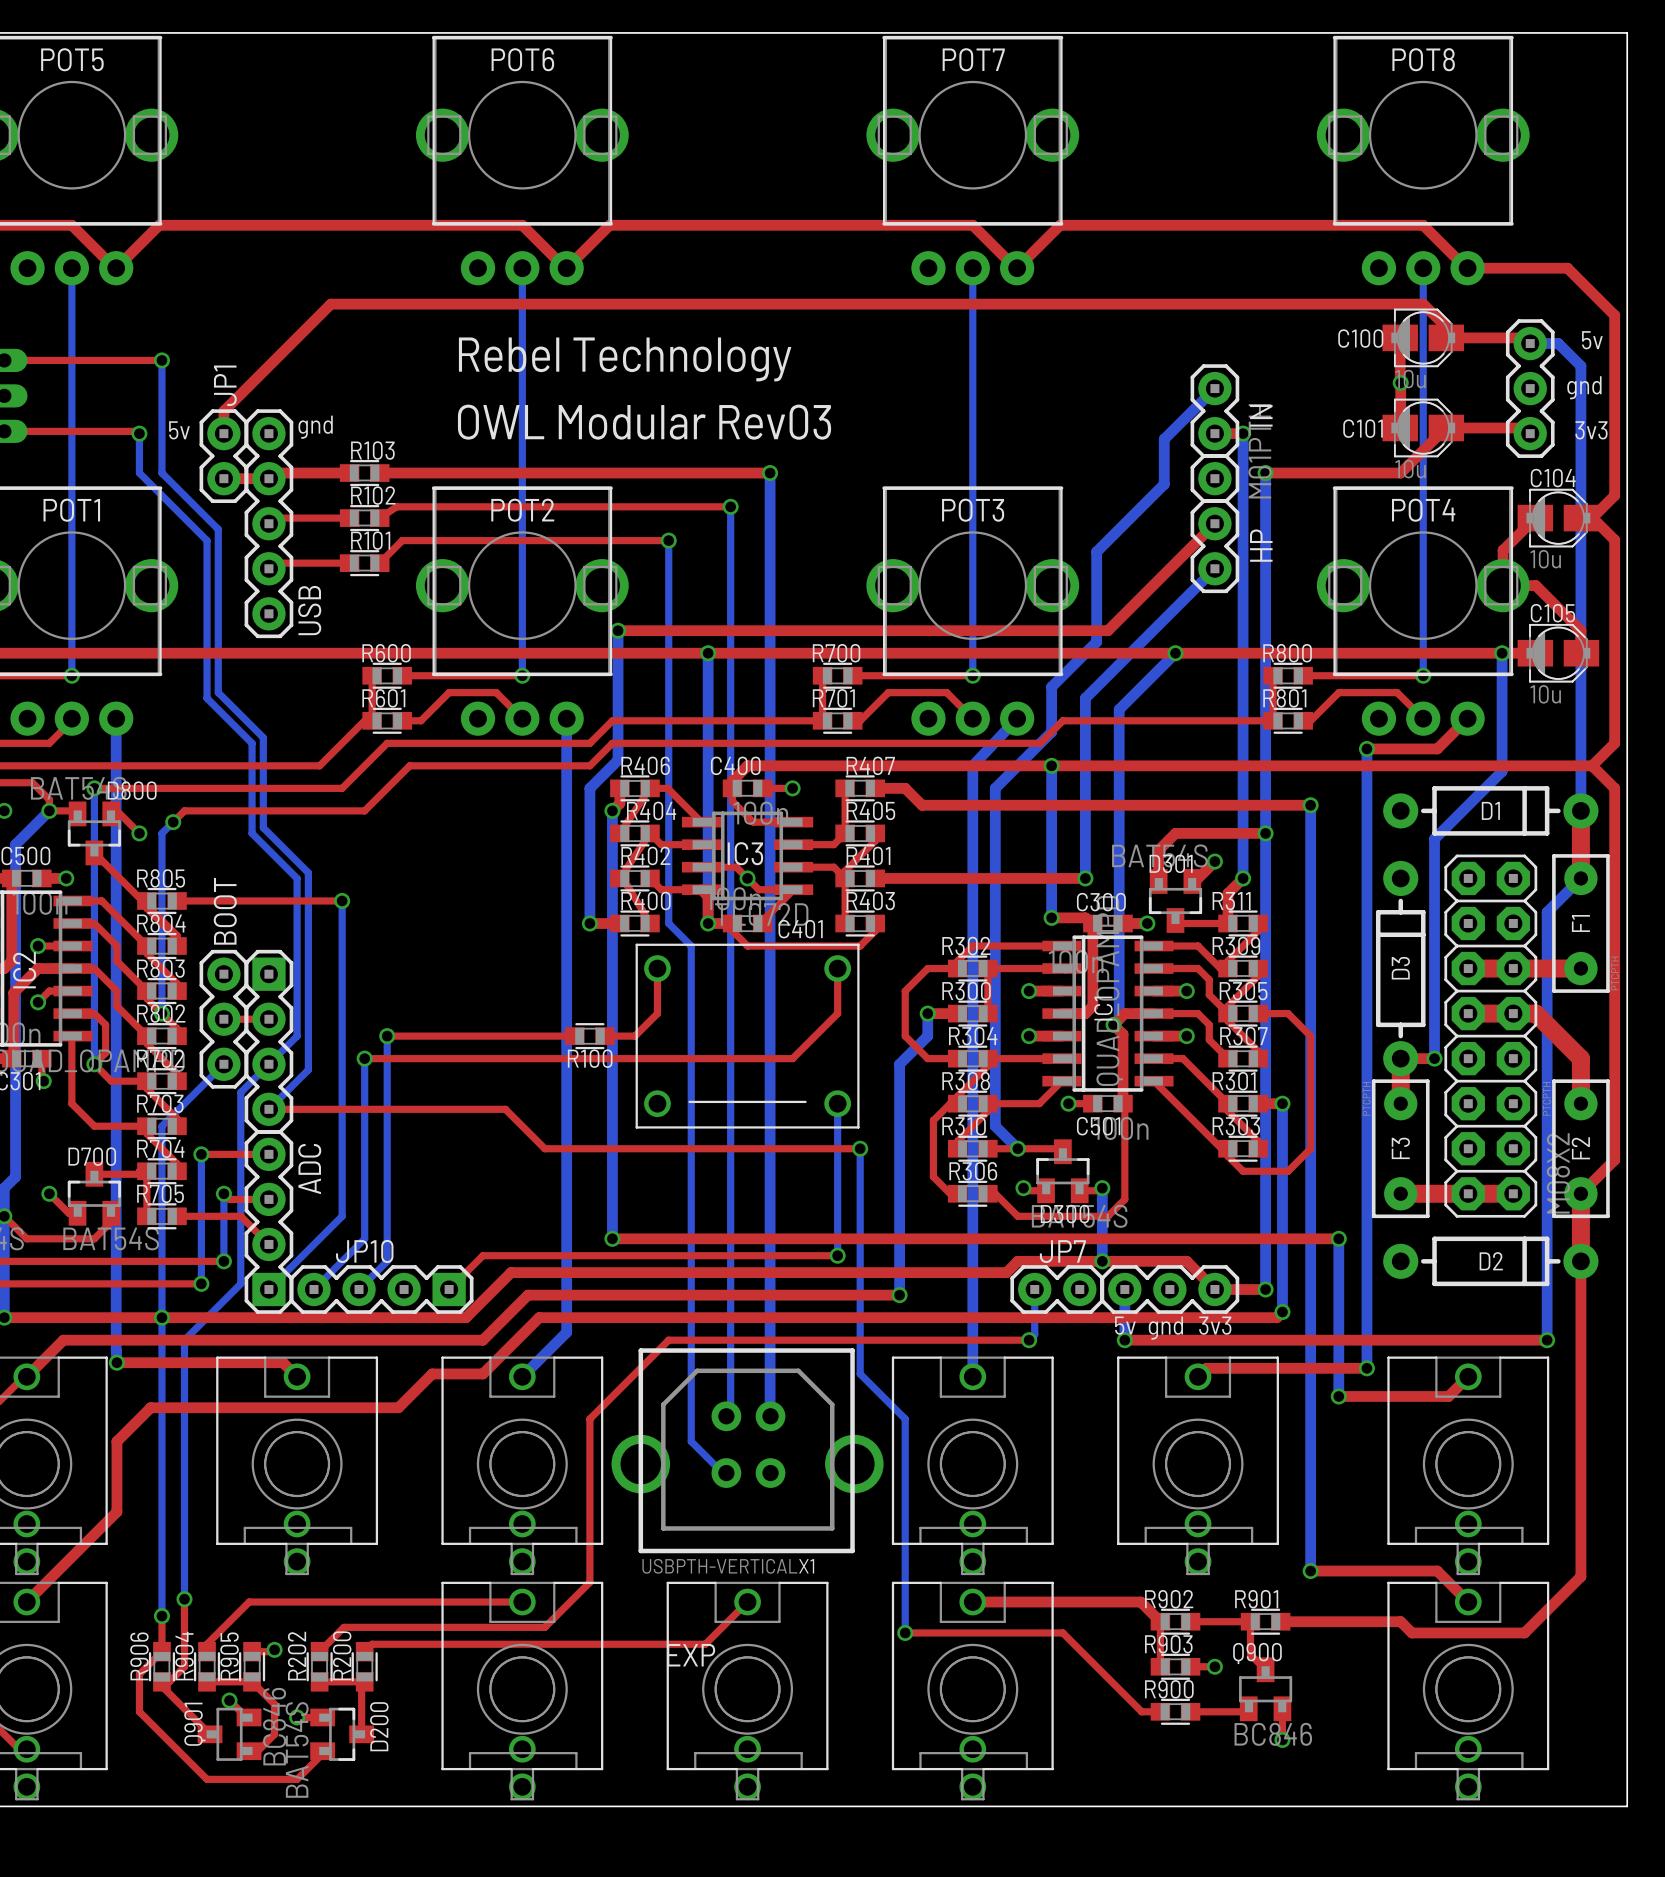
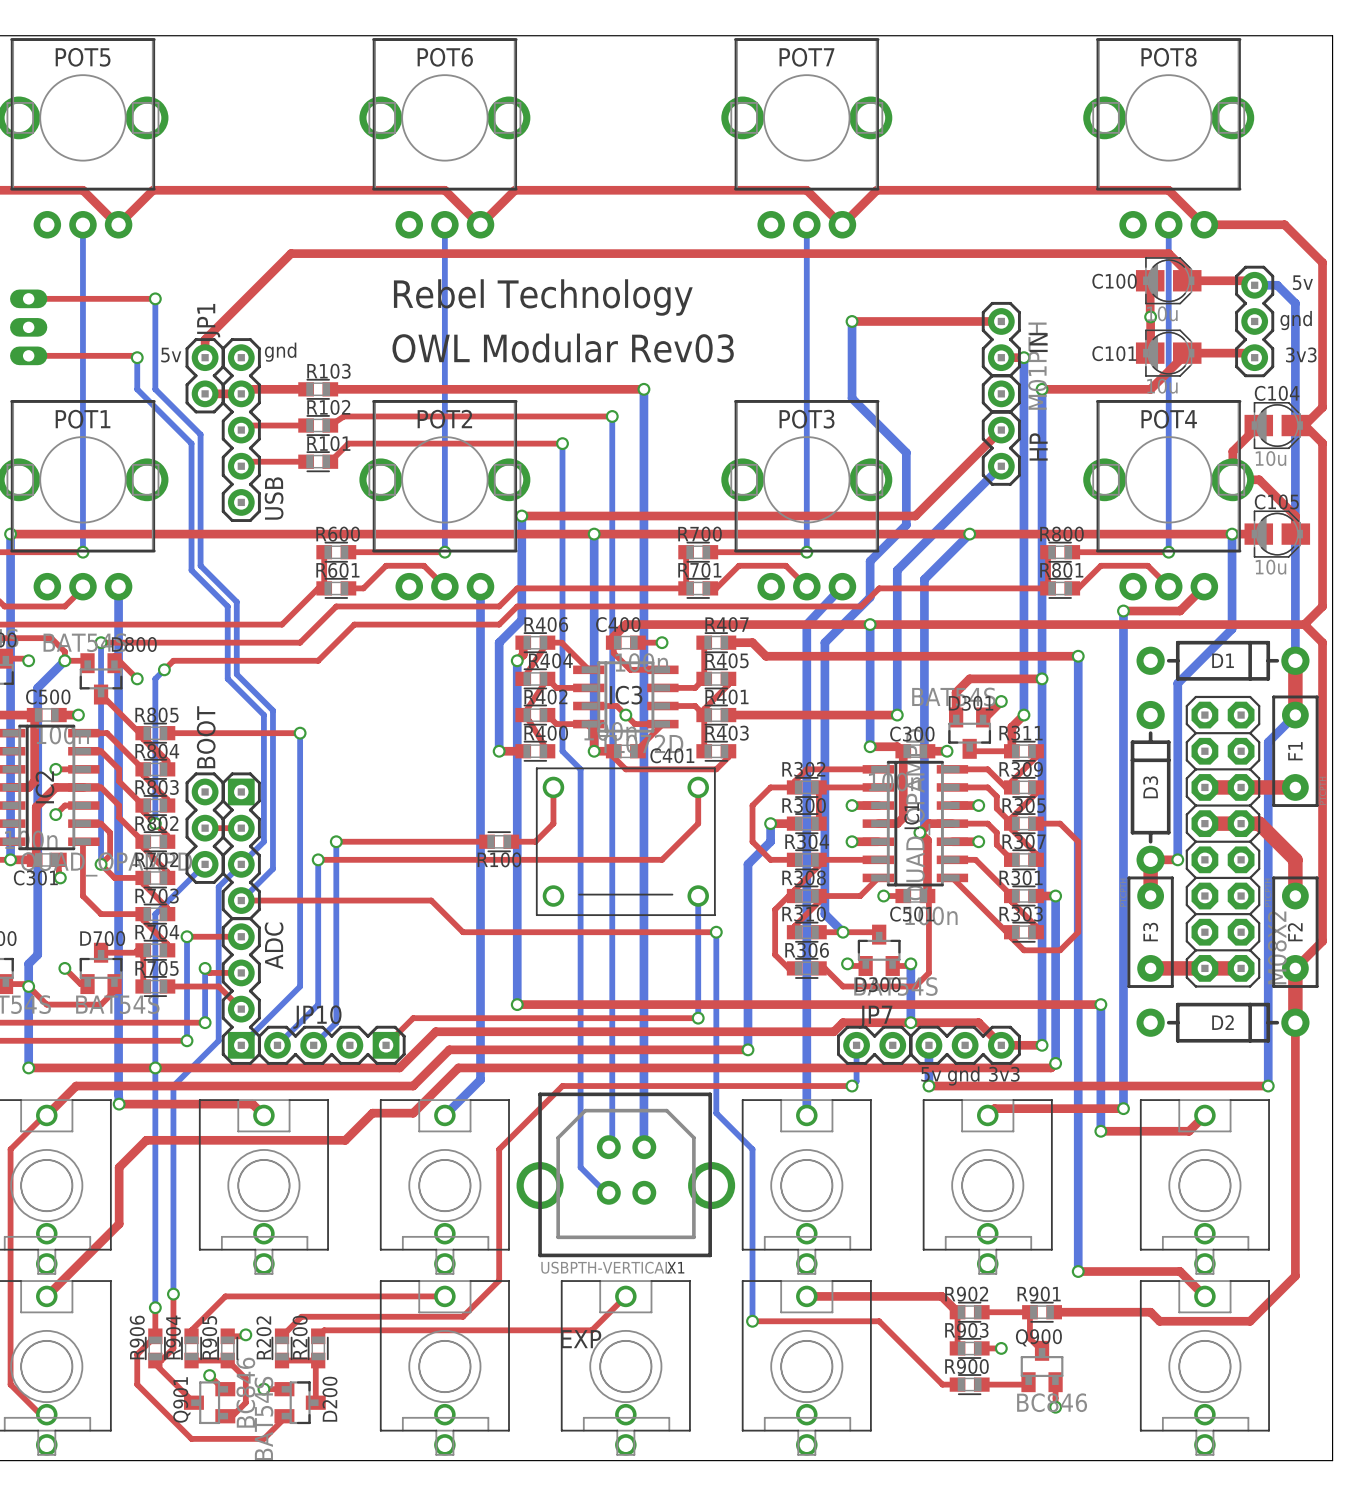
top track: none -> (852, 321) (1001, 321)
via: none -> (852, 321)
bottom track: (1214, 388) (1164, 439) (1164, 484) (1096, 551) -> (852, 321) (852, 398) (906, 452)

